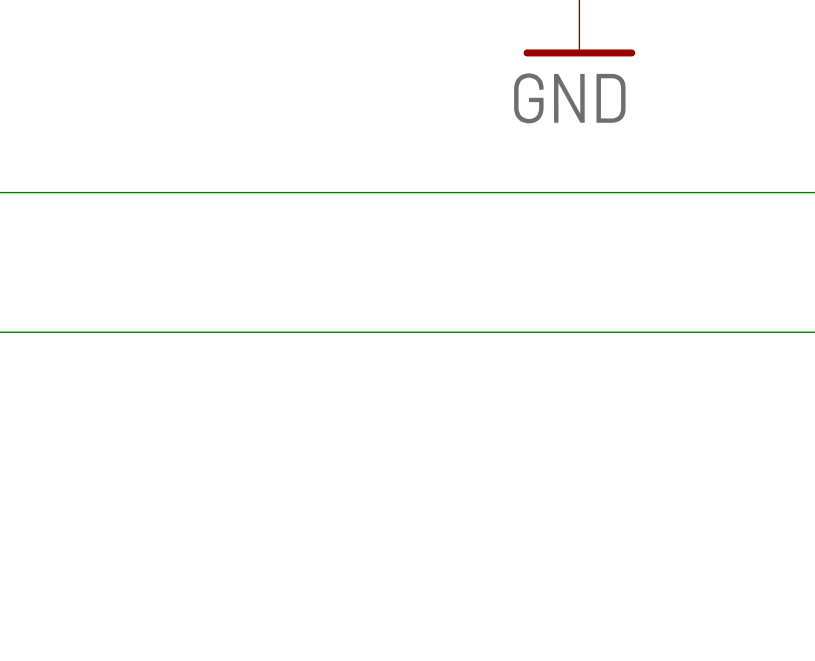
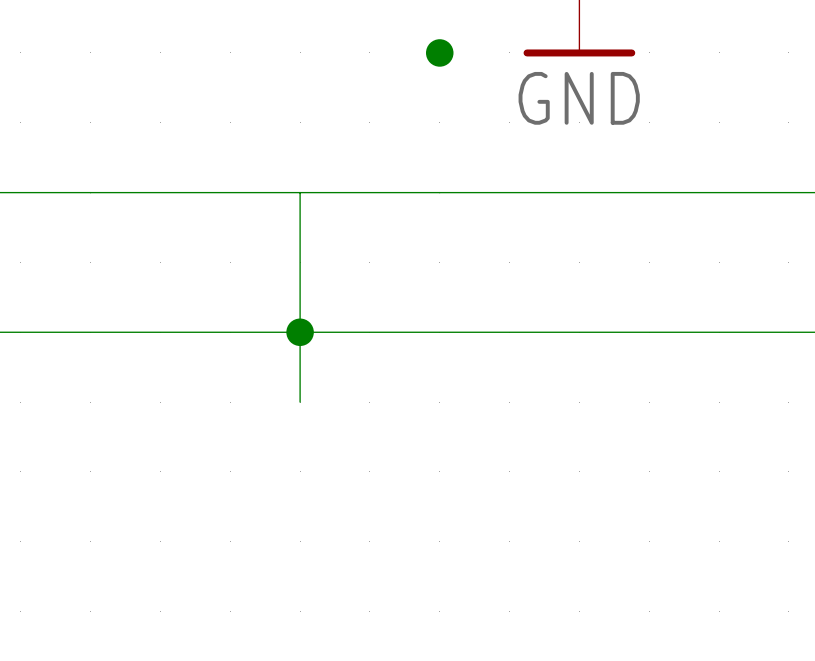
junction: none -> (439, 52)
wire: none -> (300, 192) (300, 402)
junction: none -> (300, 332)

